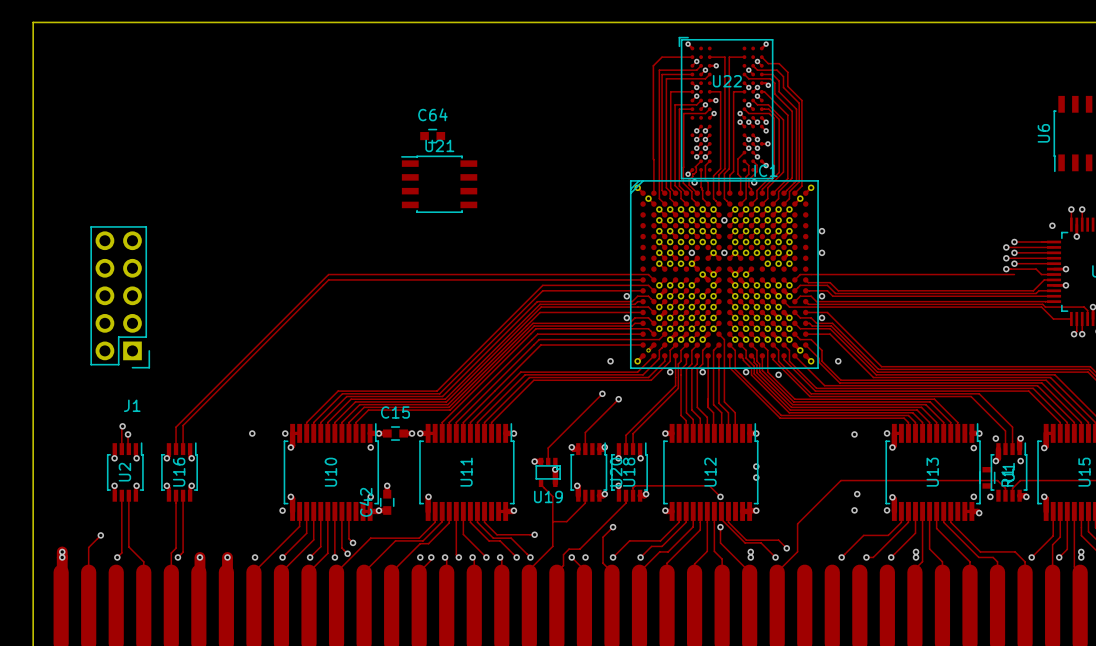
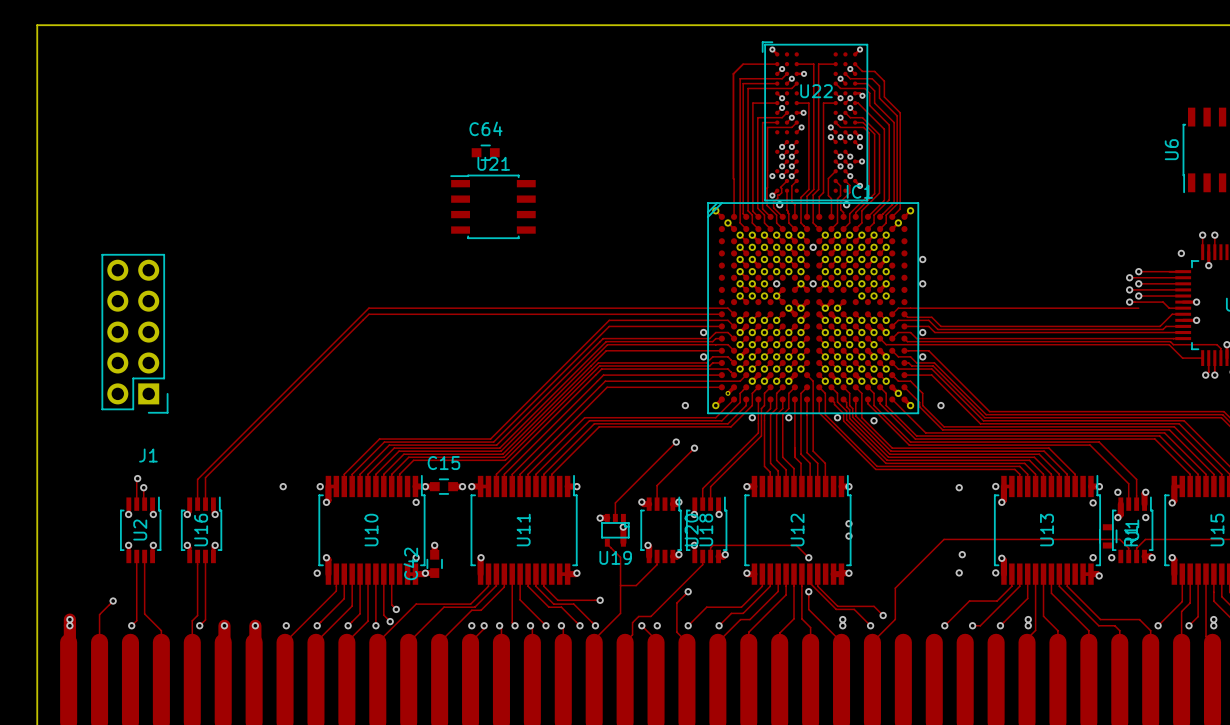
via: none -> (772, 176)

